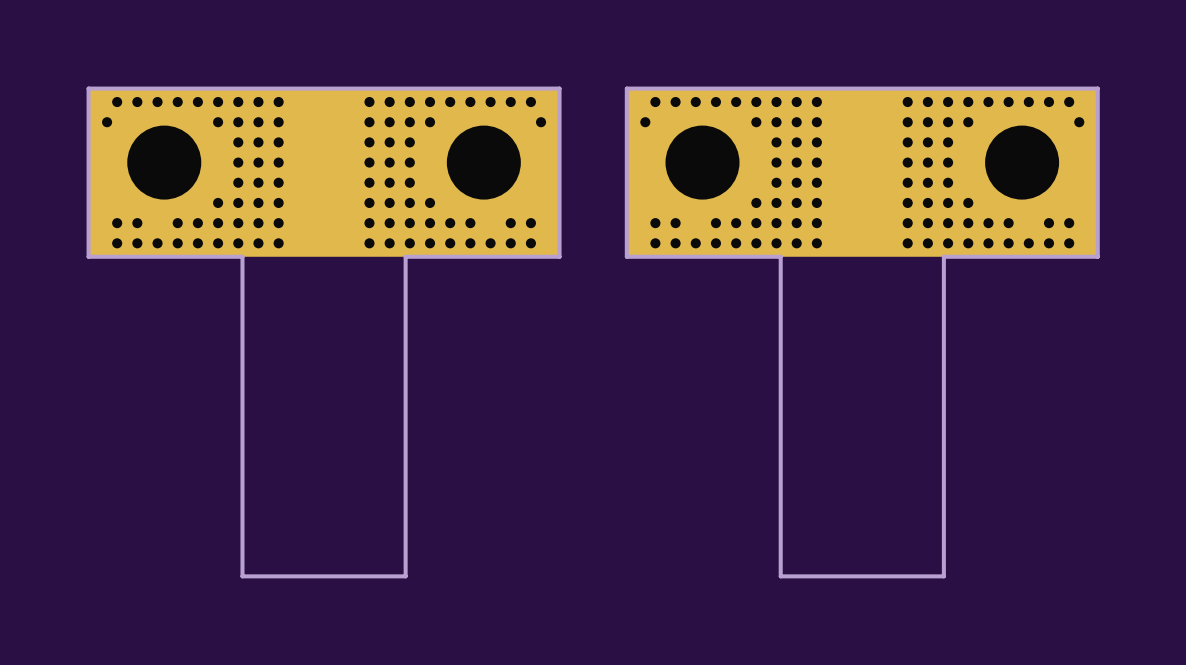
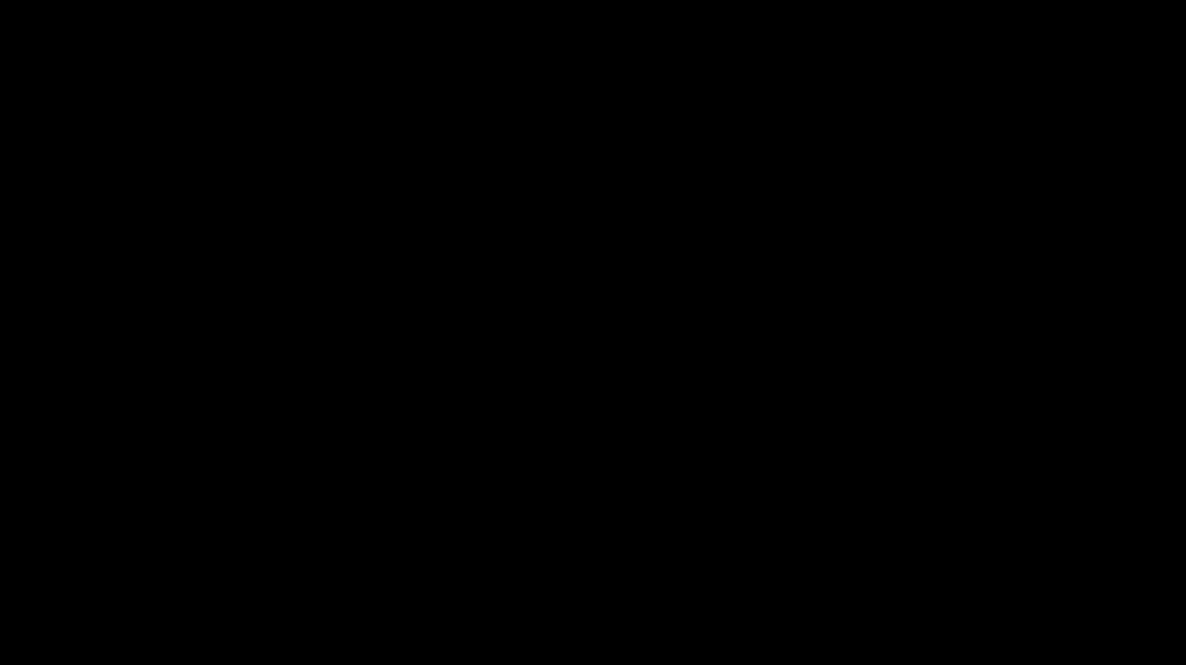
part: (324, 332) -> none
part: (862, 332) -> none

